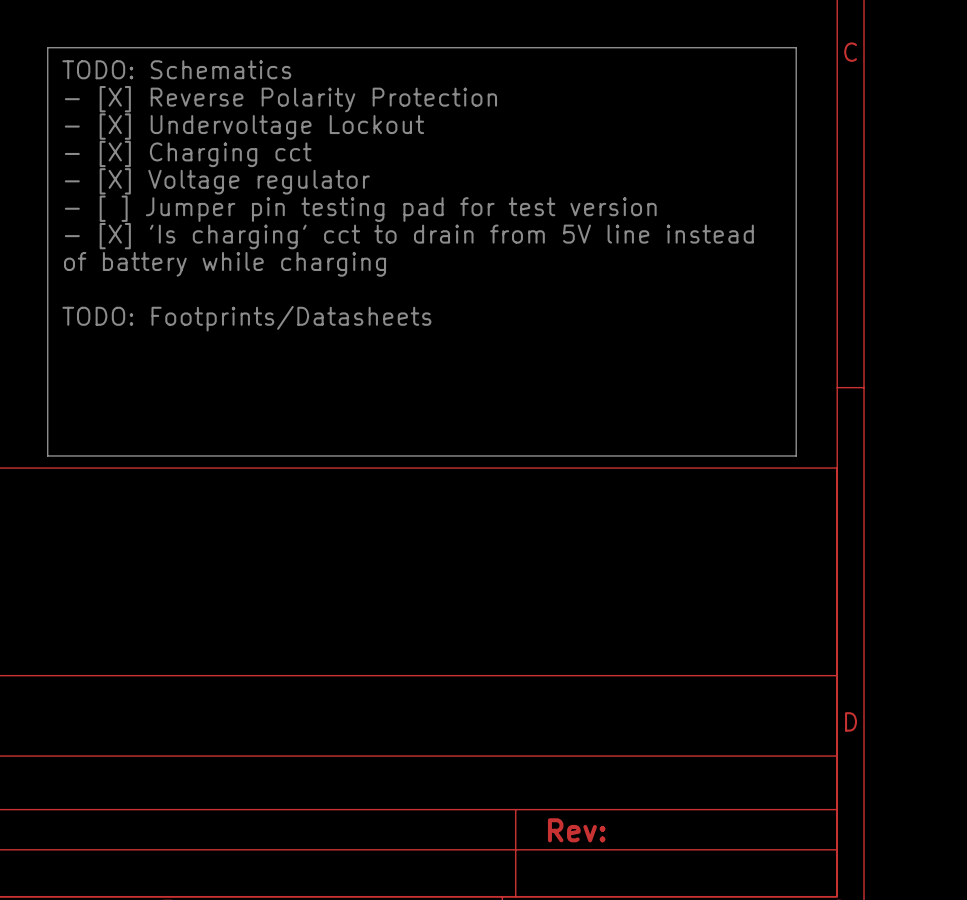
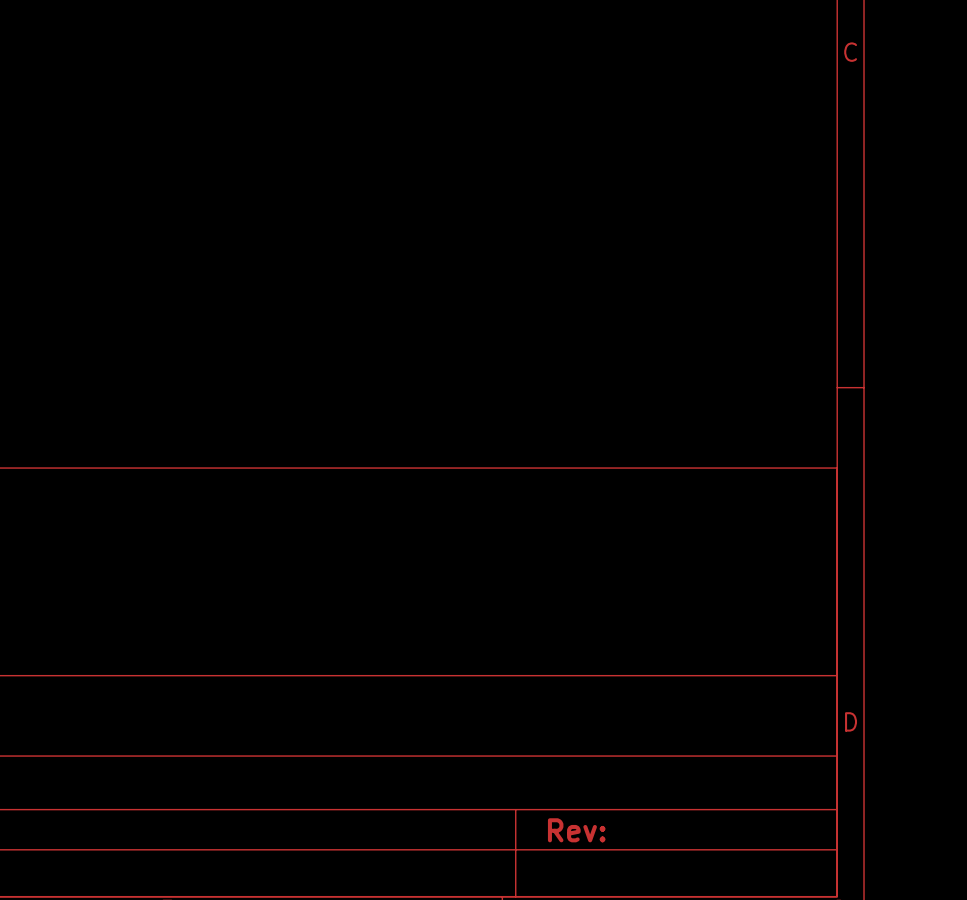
line: (47, 47) (796, 47) (796, 455) (47, 455) (47, 47) -> none
text: TODO: Schematics (176, 69) -> none
text: - [X] Reverse Polarity Protection (280, 99) -> none
text: - [X] Undervoltage Lockout (244, 126) -> none
text: - [X] Charging cct (188, 153) -> none
text: - [X] Voltage regulator (217, 181) -> none
text: - [ ] Jumper pin testing pad for test version (360, 208) -> none
text: - [X] 'Is charging' cct to drain from 5V line instead (409, 236) -> none
text: of battery while charging (225, 264) -> none
text: TODO: Footprints/Datasheets (246, 318) -> none

